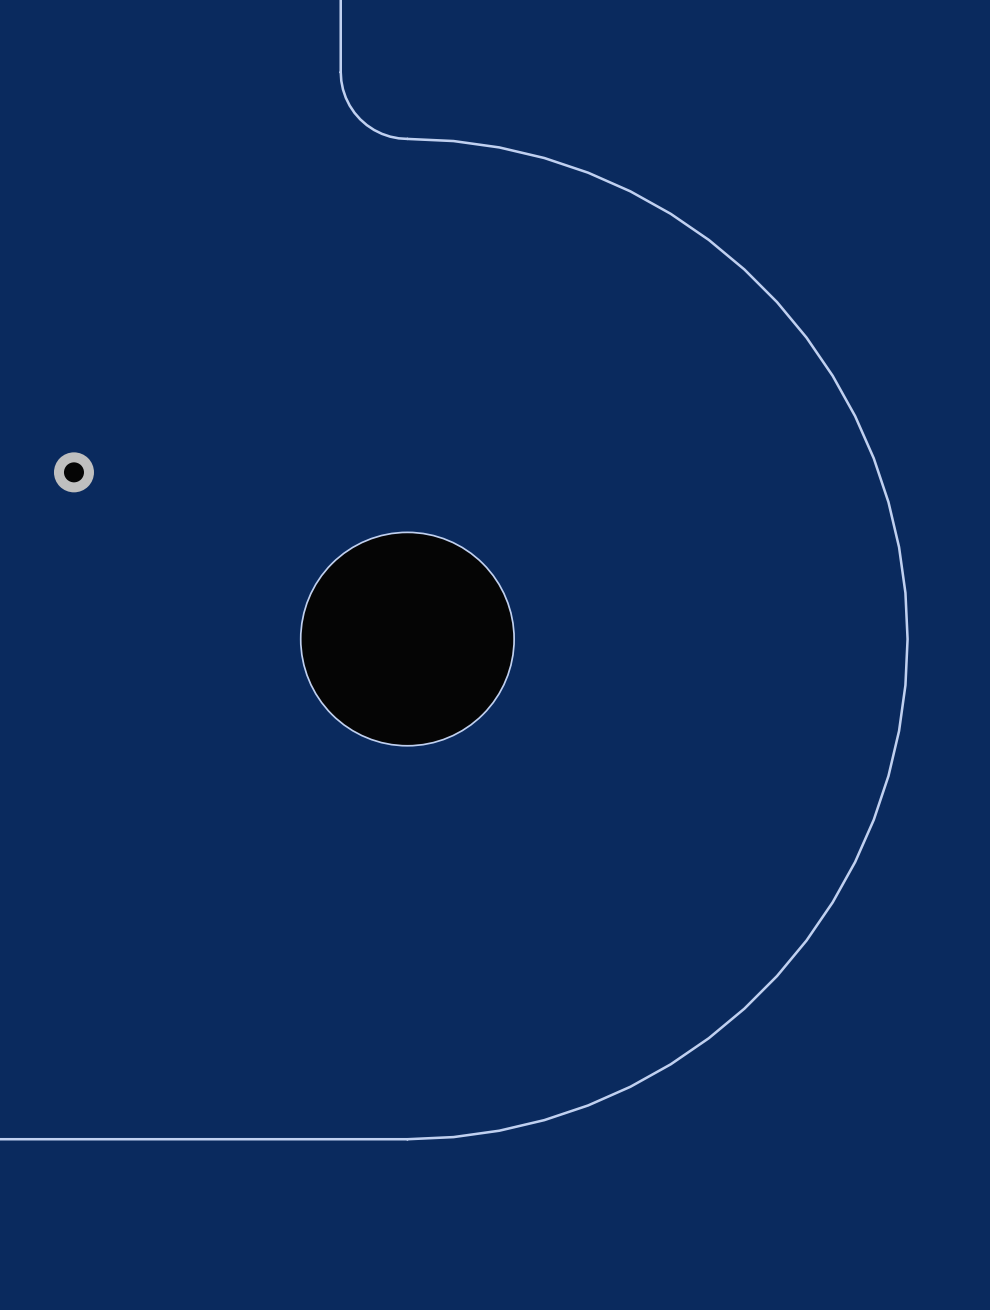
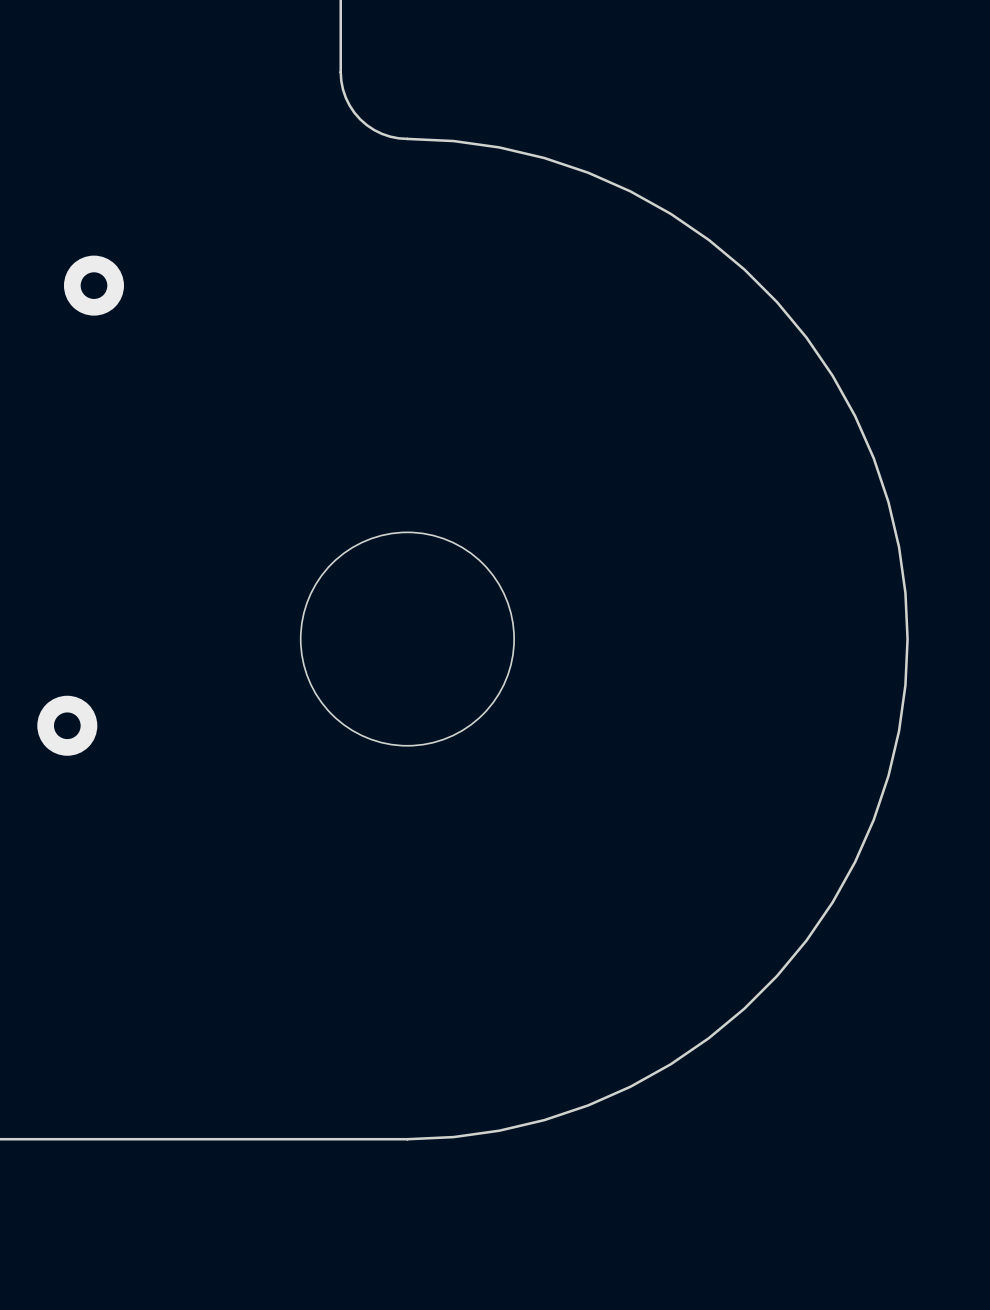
via: none -> (93, 285)
via: (73, 472) -> none
via: none -> (67, 725)

